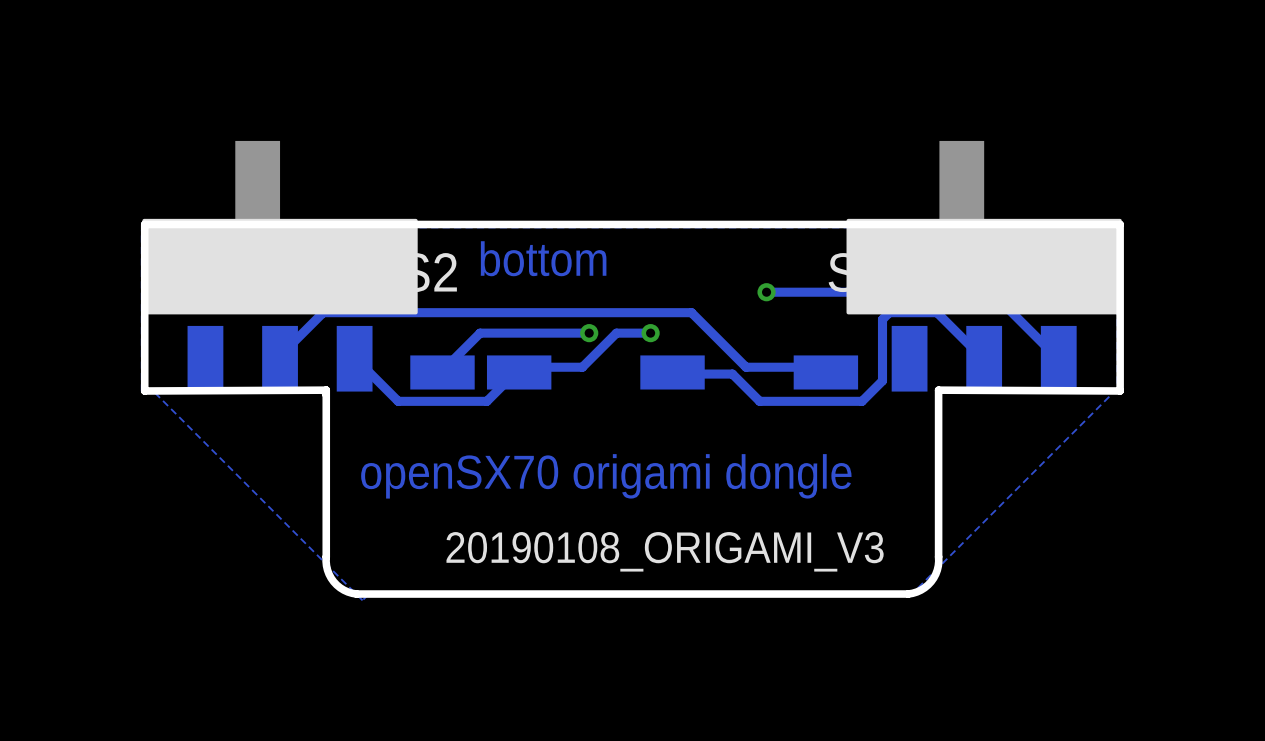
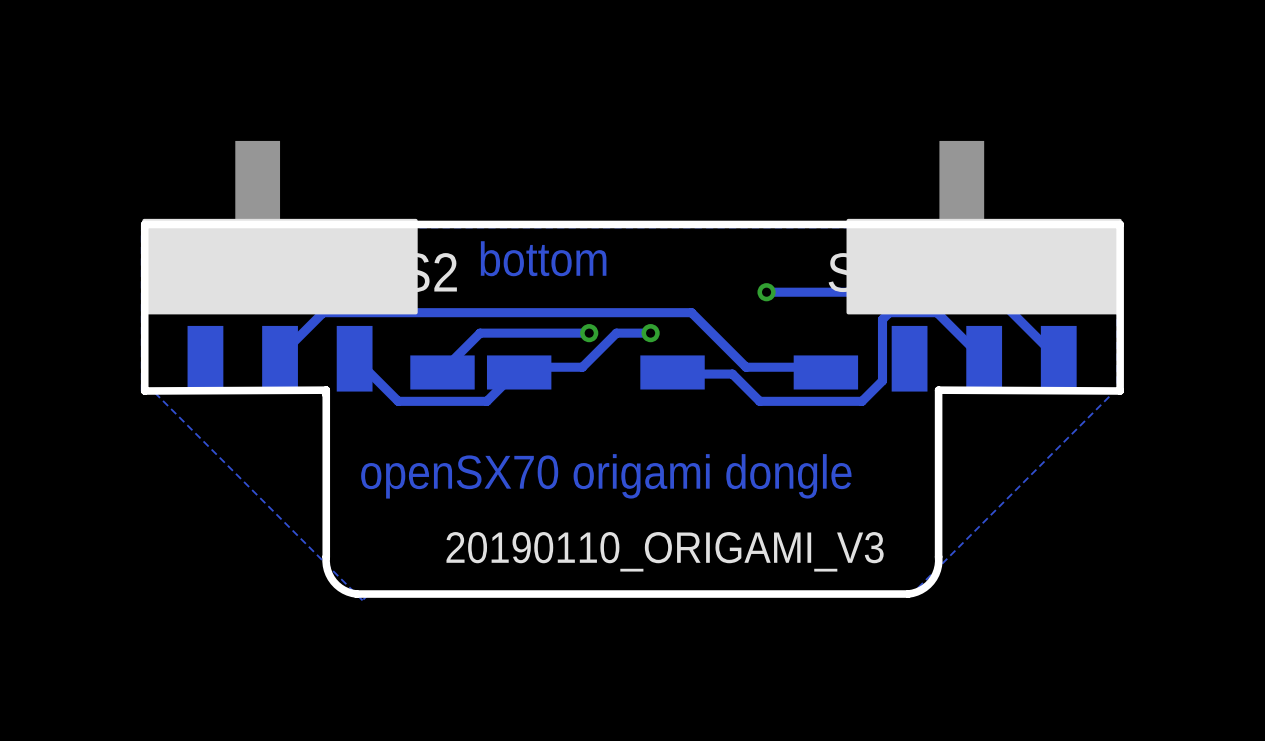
text: 20190108_ORIGAMI_V3 (665, 551) -> 20190110_ORIGAMI_V3 (665, 551)

